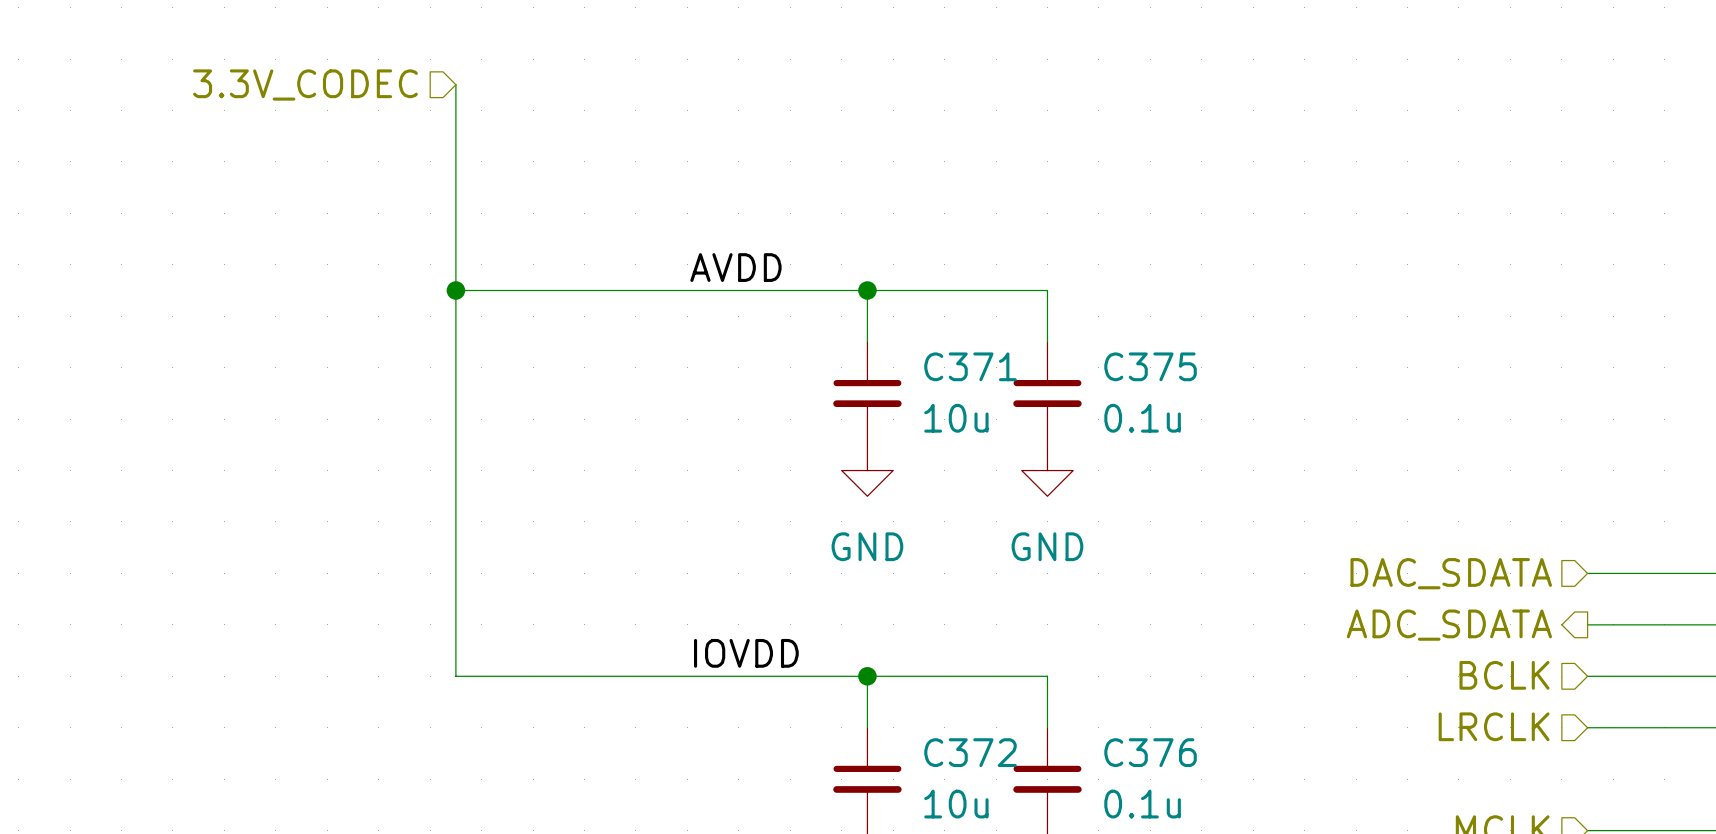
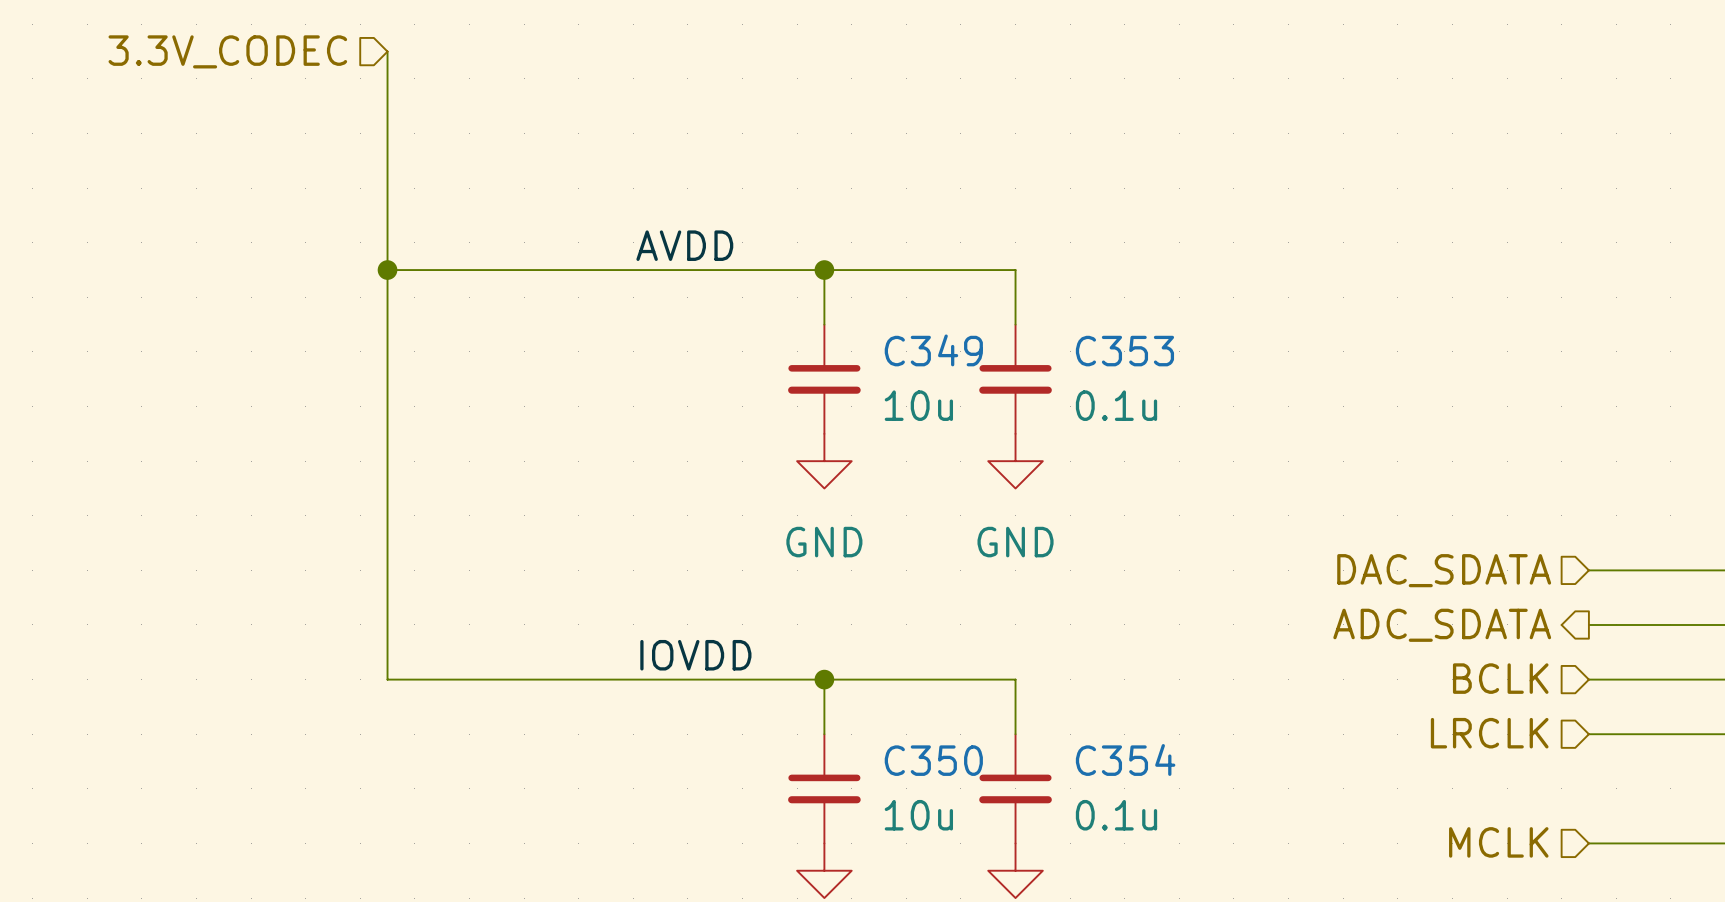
C371 name: C371 (970, 366) -> C349 (933, 350)
C375 name: C375 (1150, 366) -> C353 (1124, 351)
C372 name: C372 (970, 752) -> C350 (933, 760)
C376 name: C376 (1150, 752) -> C354 (1125, 759)

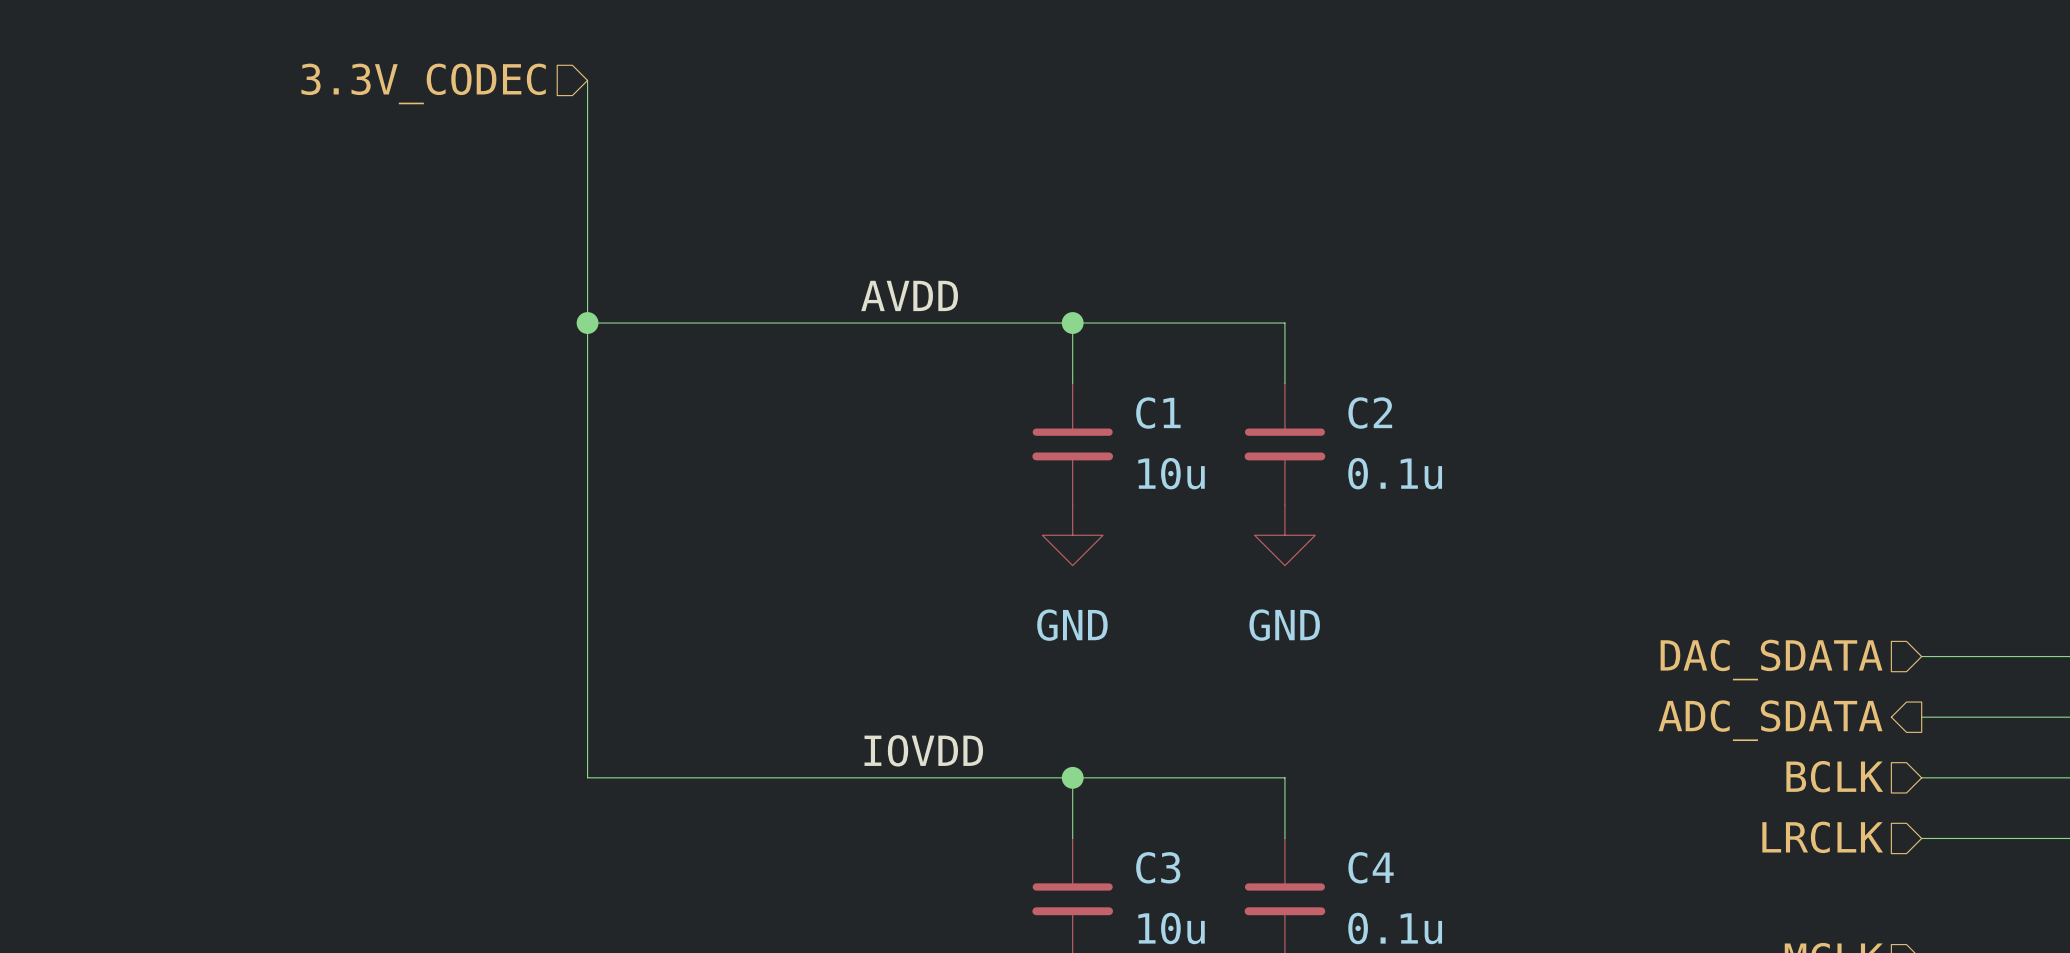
C349 name: C349 (933, 350) -> C1 (1158, 413)
C353 name: C353 (1124, 351) -> C2 (1370, 413)
C354 name: C354 (1125, 759) -> C4 (1371, 867)
C350 name: C350 (933, 760) -> C3 (1158, 867)

